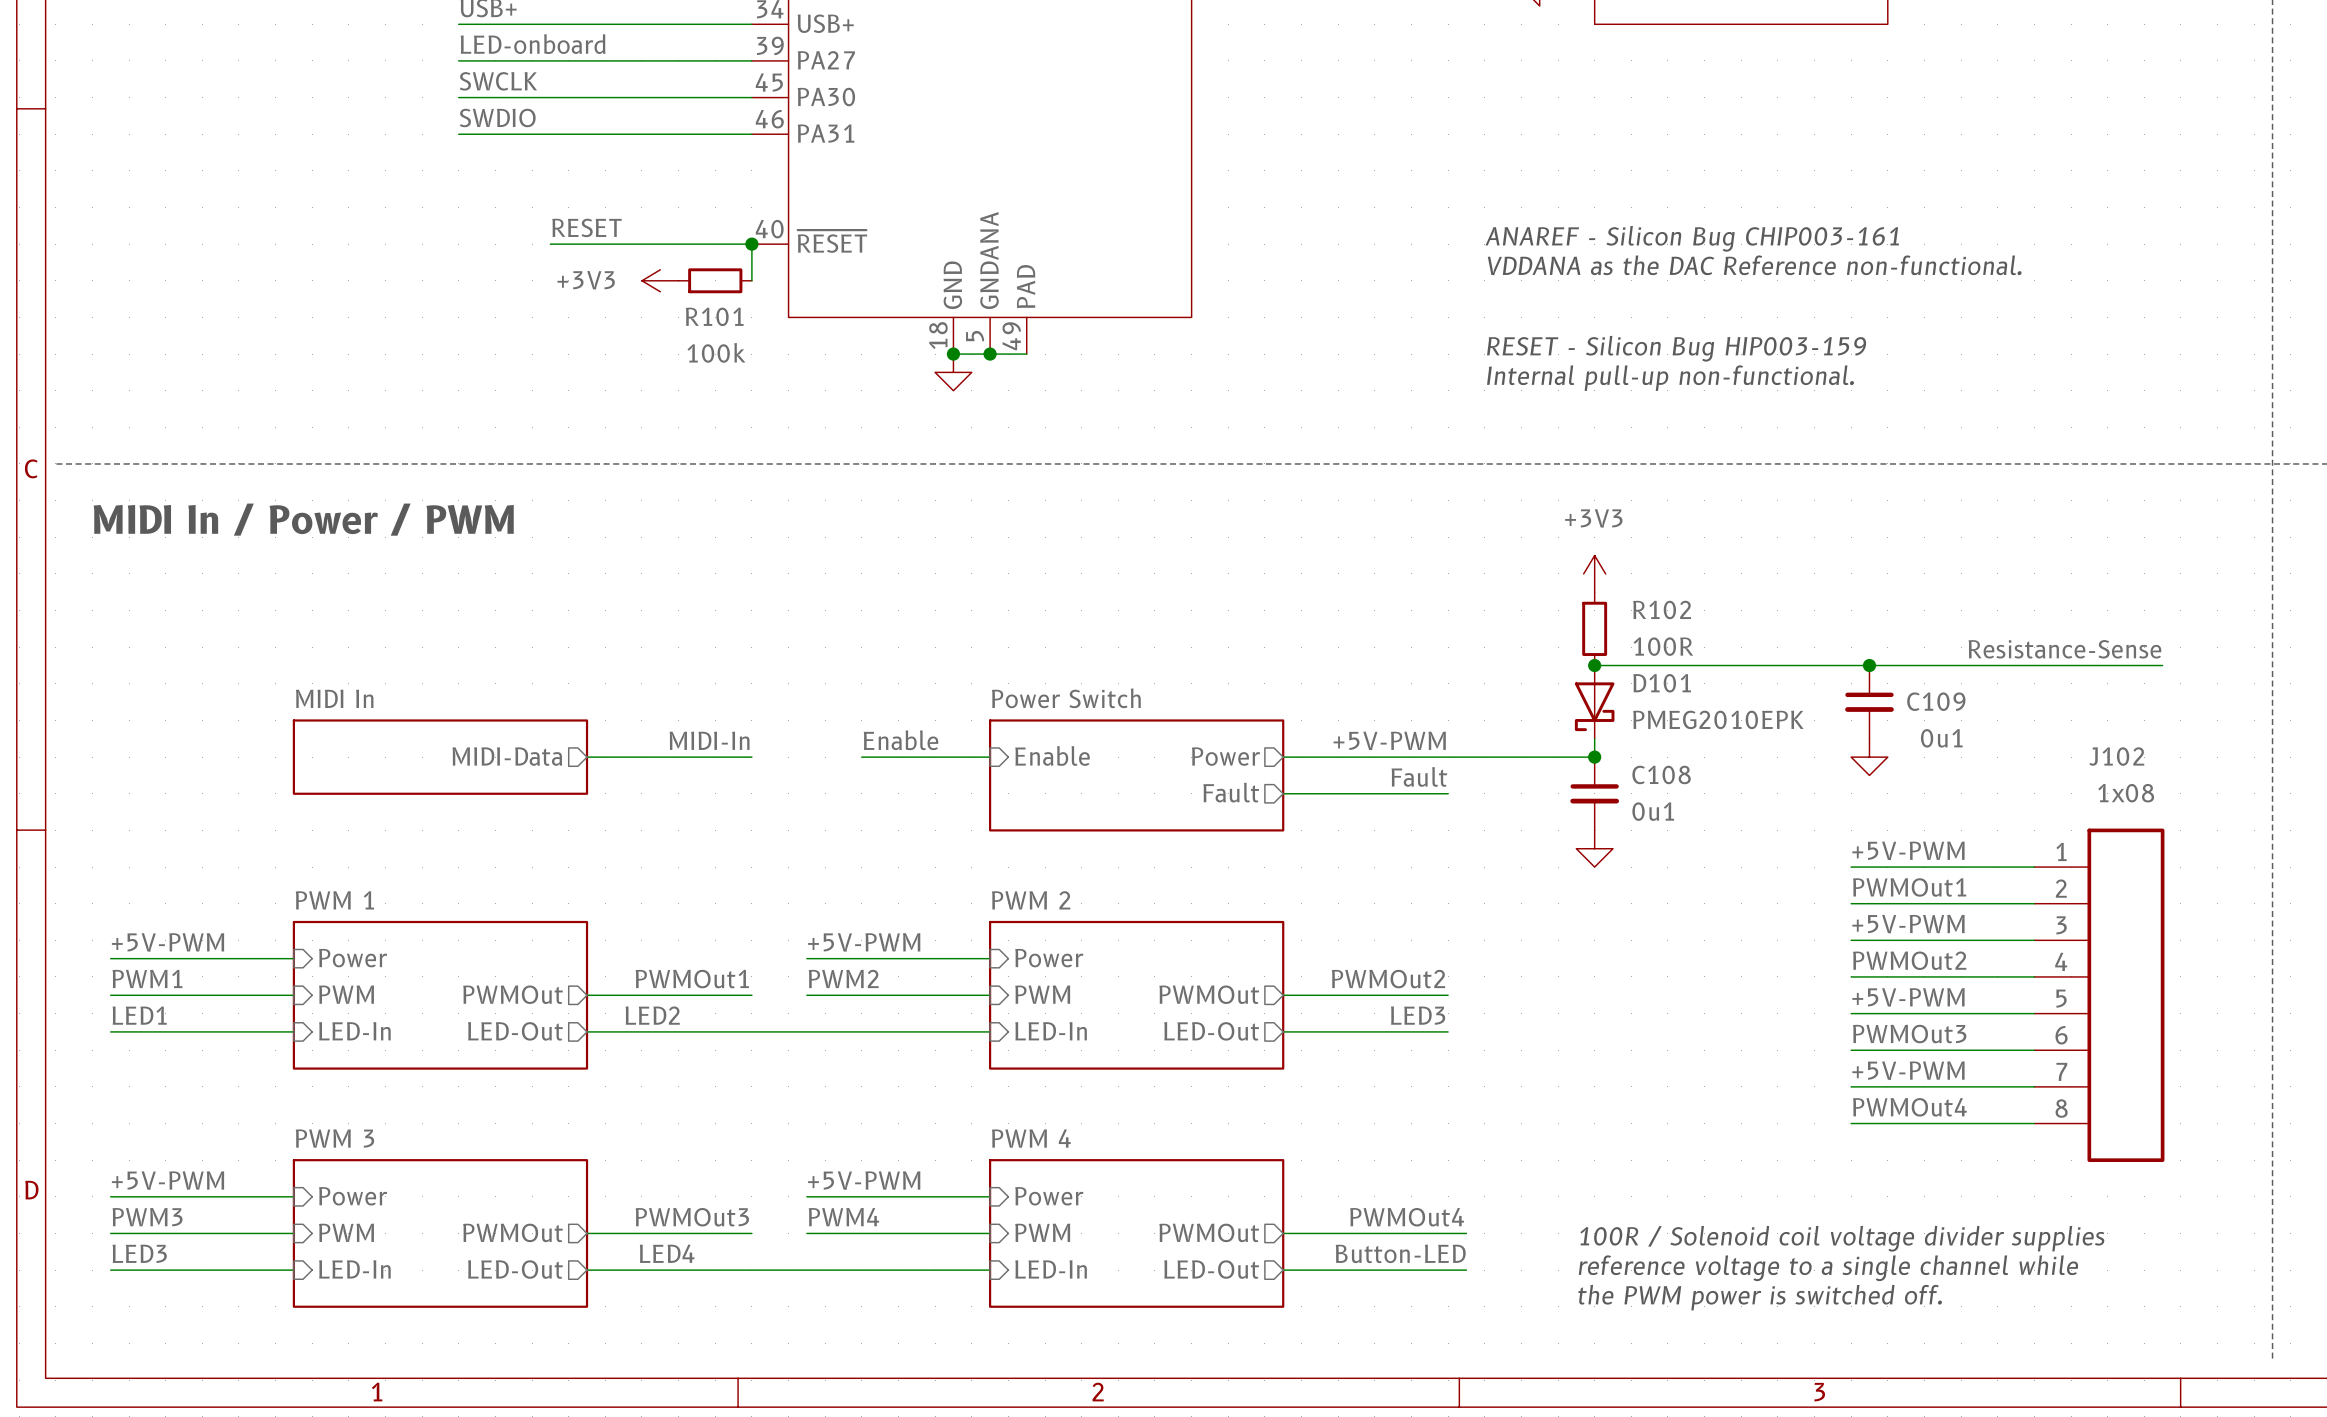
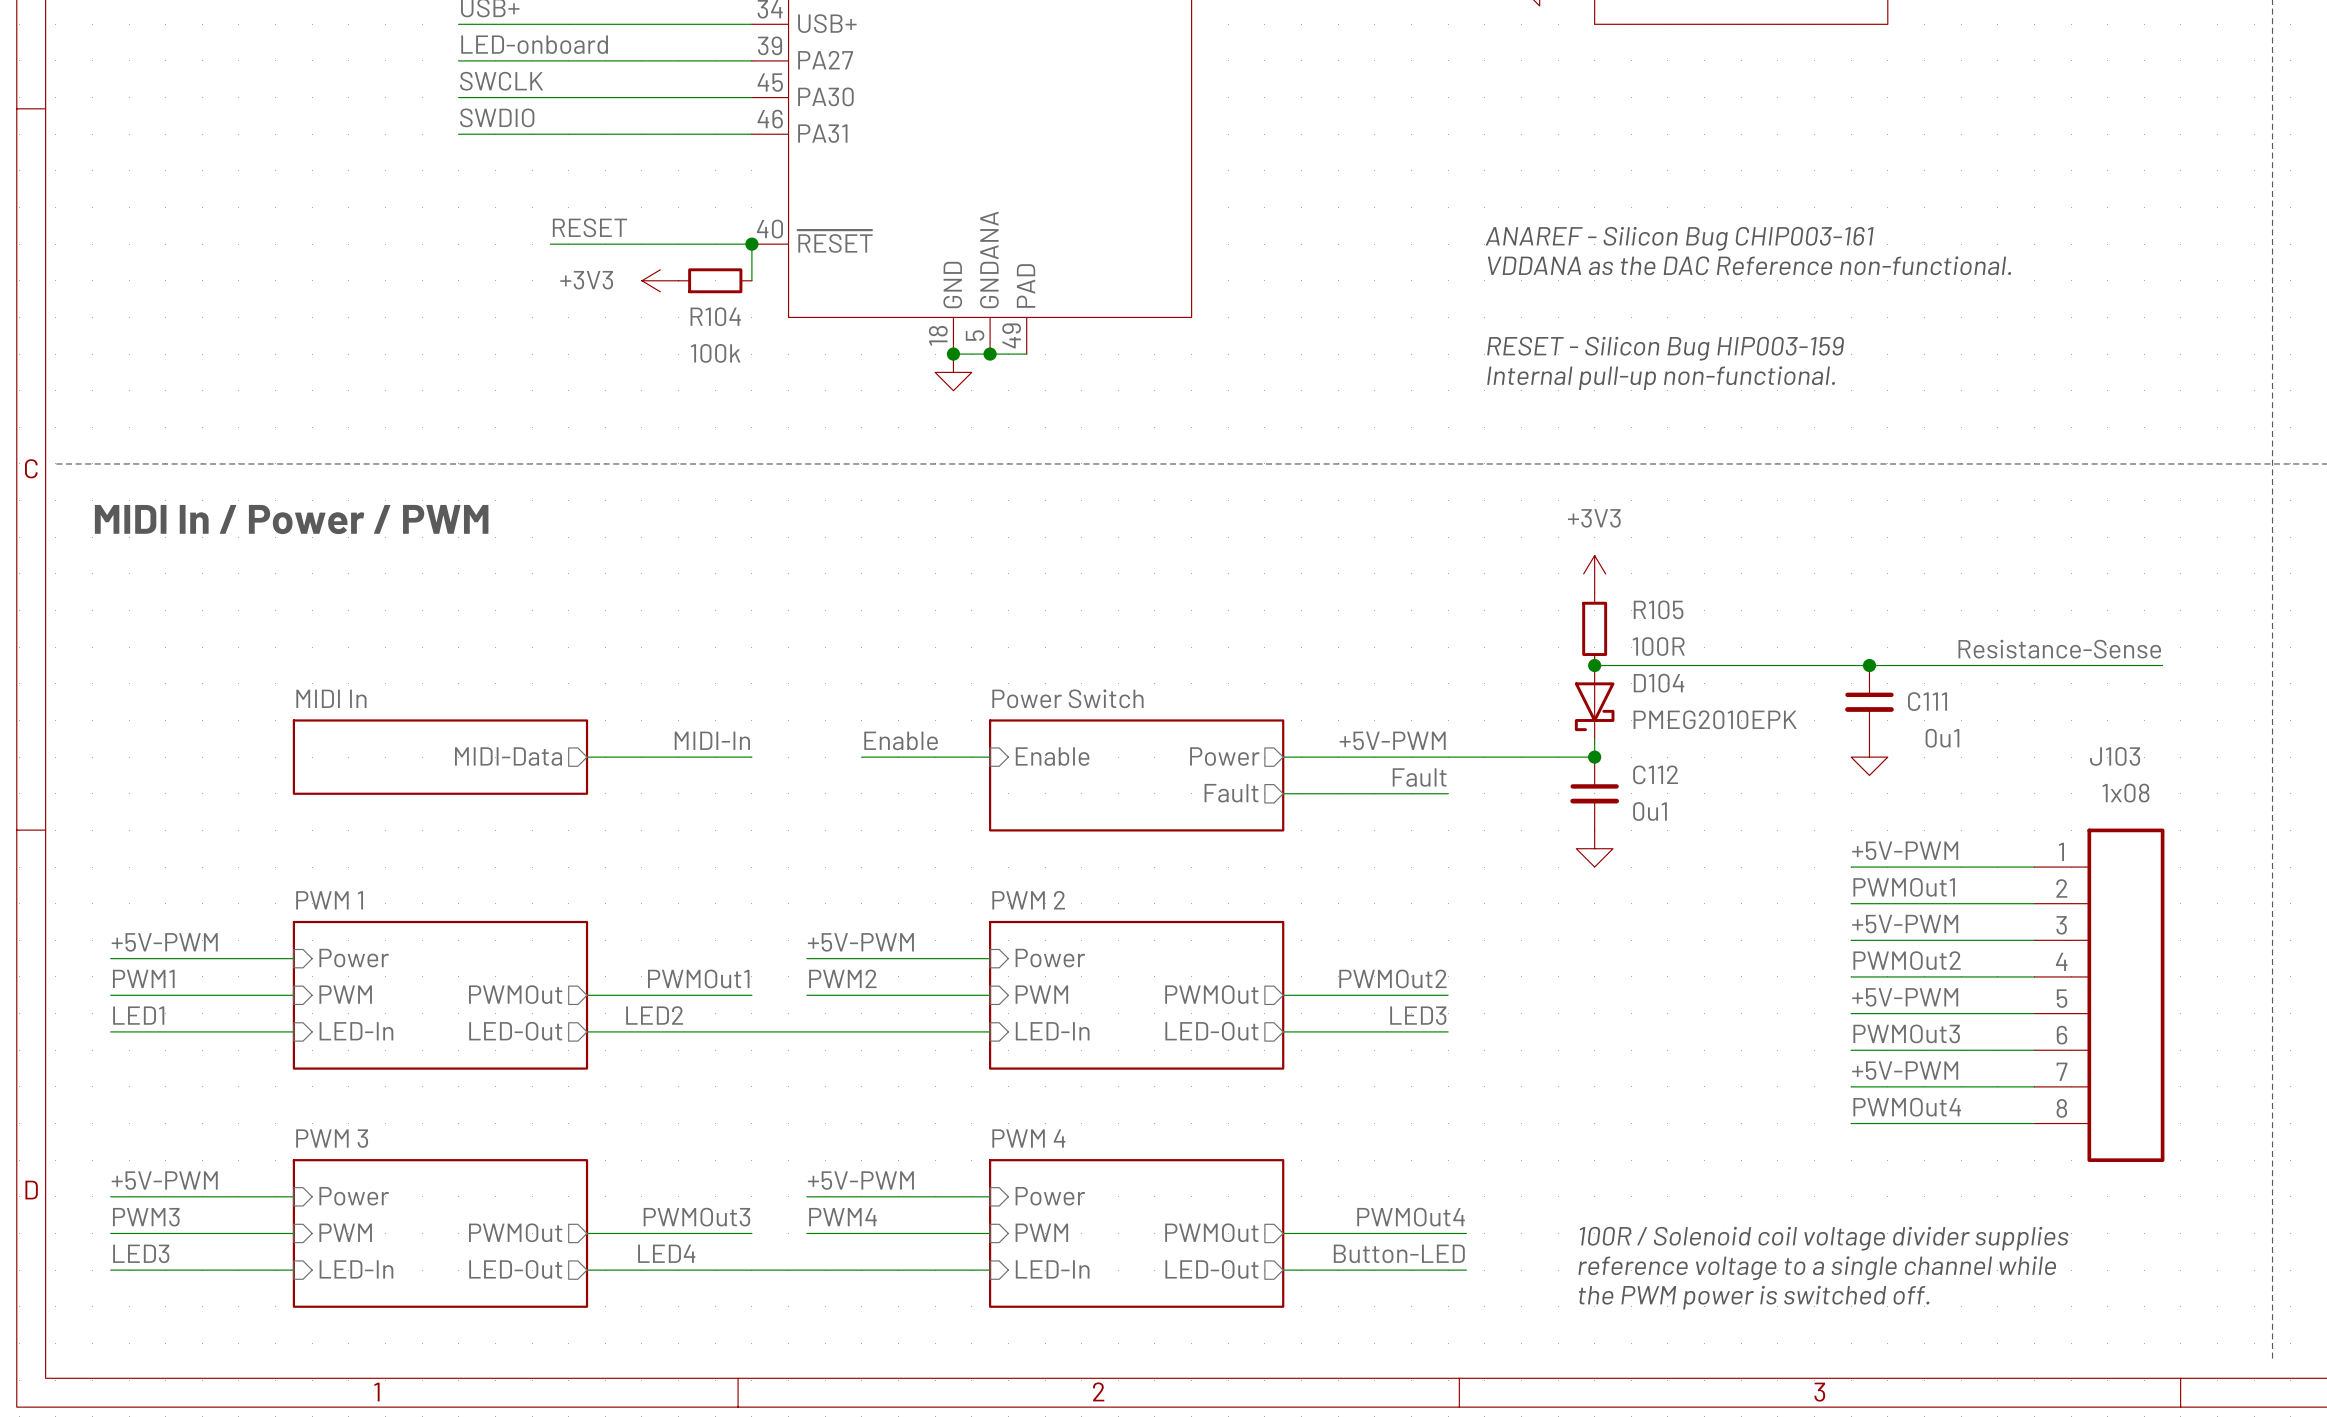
R101 name: R101 (714, 316) -> R104 (715, 316)
R102 name: R102 (1662, 609) -> R105 (1658, 609)
D101 name: D101 (1662, 683) -> D104 (1659, 683)
C109 name: C109 (1936, 701) -> C111 (1927, 701)
J102 name: J102 (2116, 756) -> J103 (2115, 756)
C108 name: C108 (1661, 774) -> C112 (1655, 774)

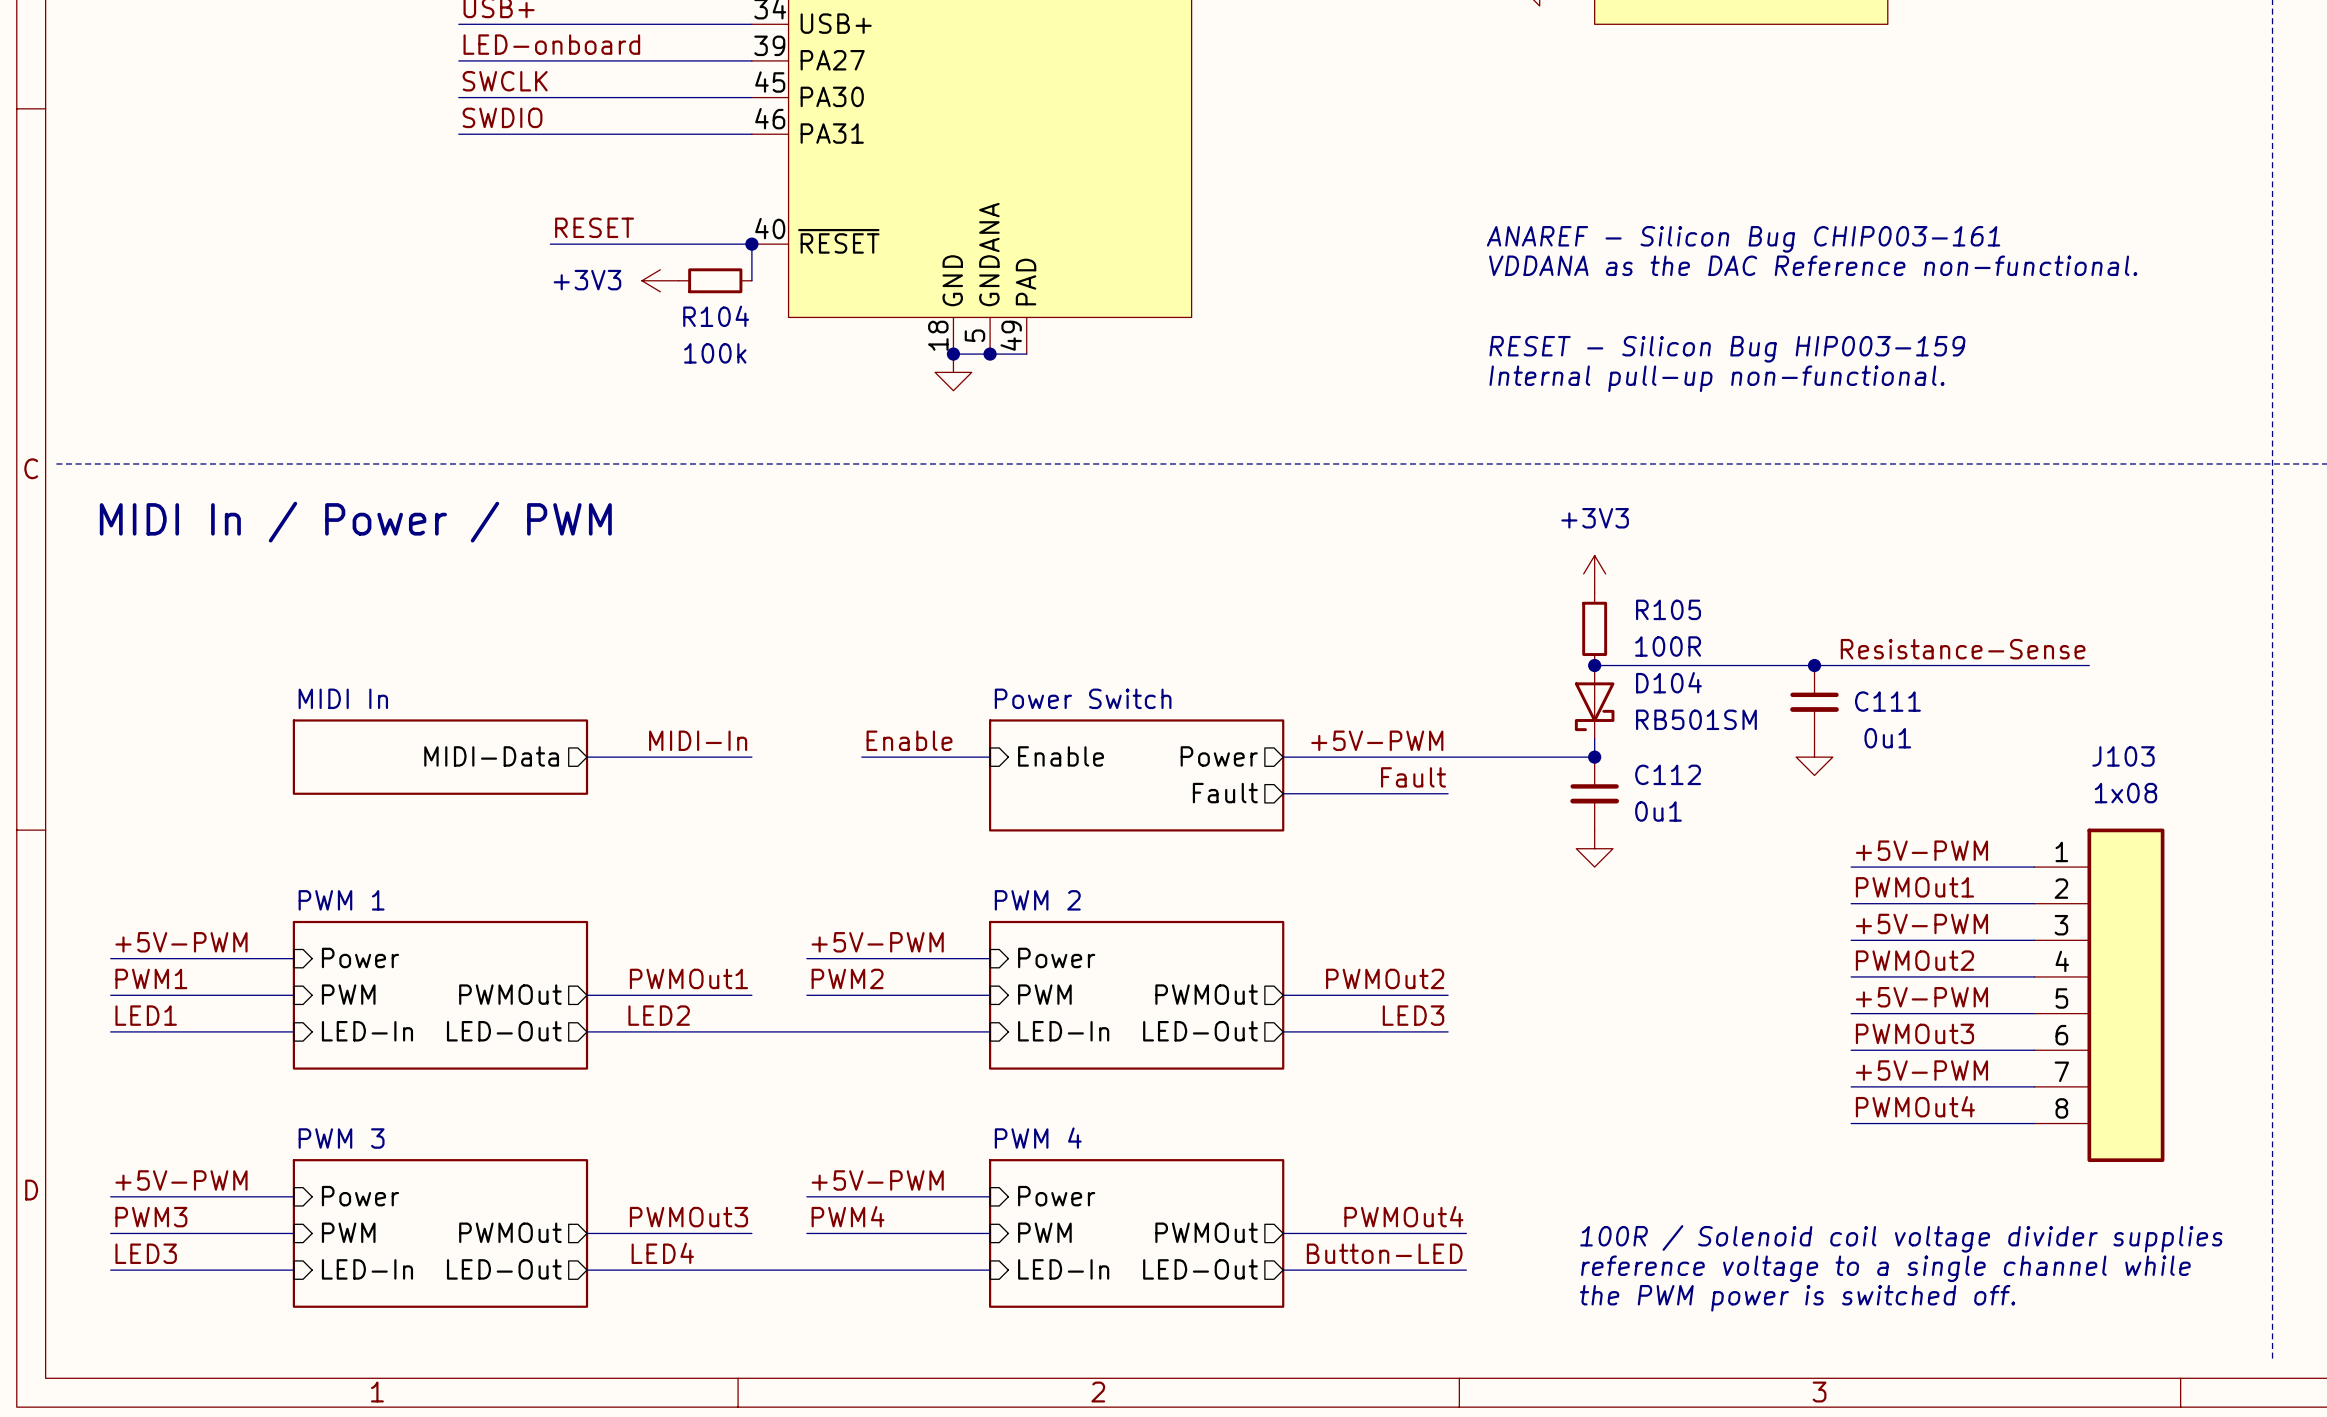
label position: Resistance-Sense (2059, 649) -> Resistance-Sense (1963, 649)
junction position: (1869, 665) -> (1814, 665)
wire: (2089, 665) (2162, 665) -> none
C111 position: (1869, 702) -> (1814, 702)
D104 value: PMEG2010EPK (1715, 719) -> RB501SM (1696, 719)
power symbol position: (1869, 757) -> (1814, 757)

